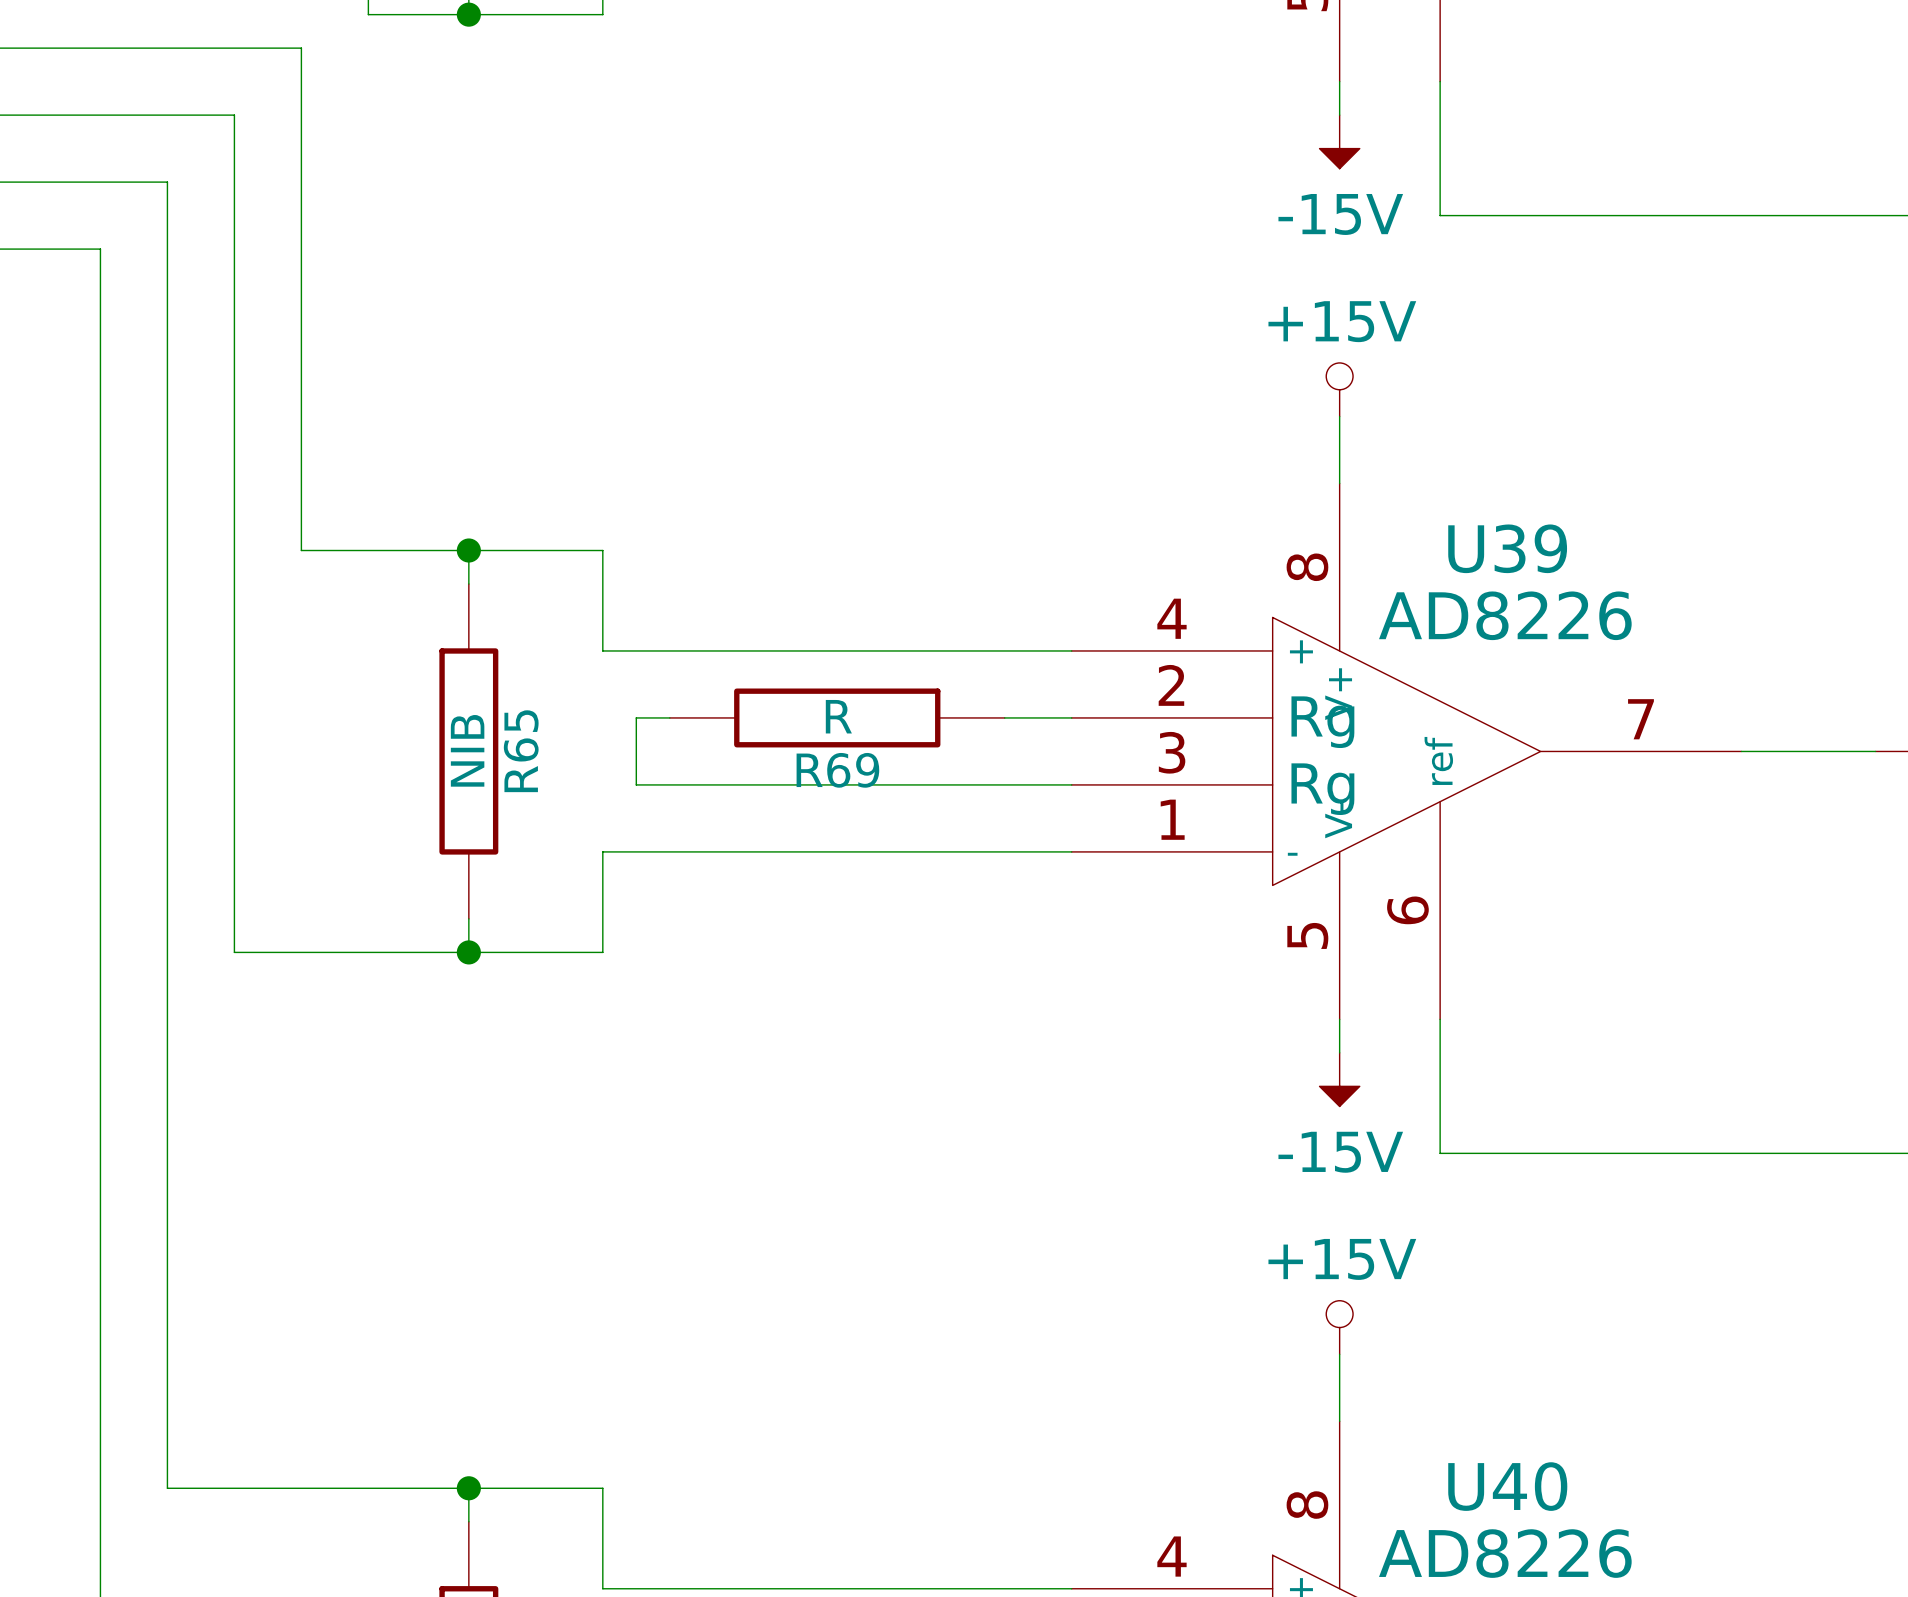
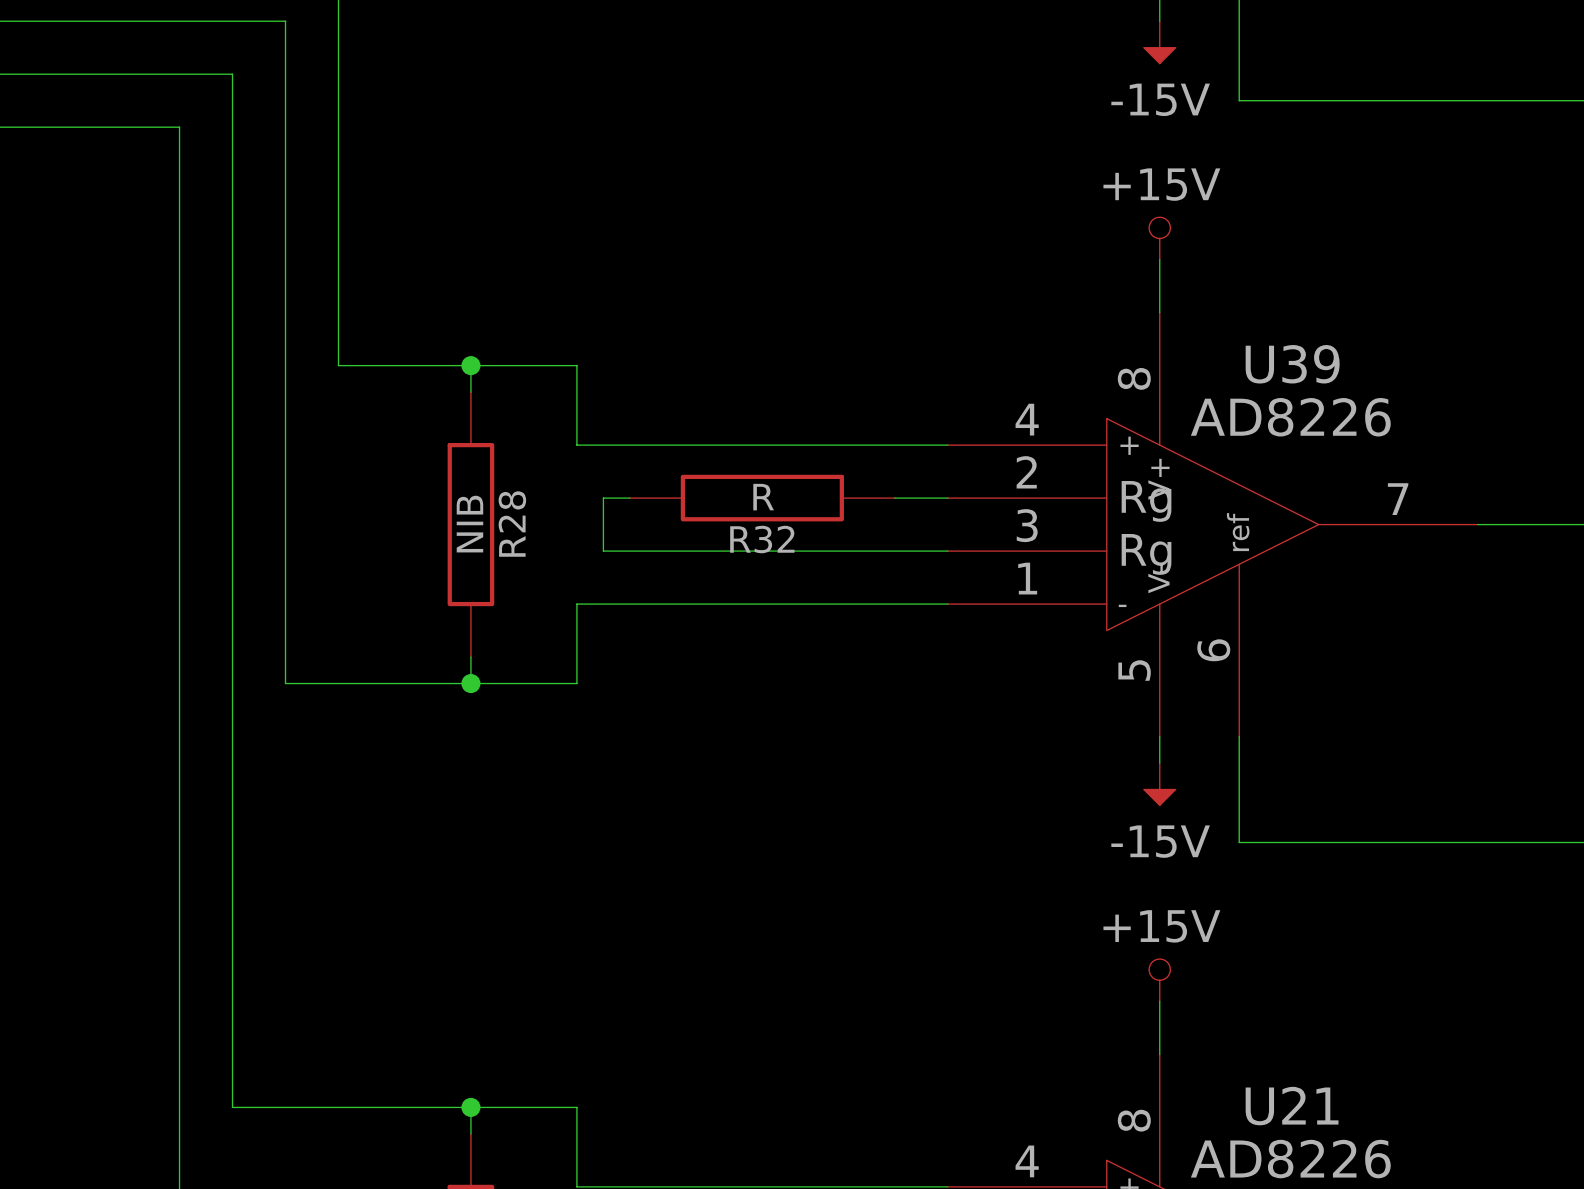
R65 name: R65 (521, 751) -> R28 (512, 524)
R69 name: R69 (837, 770) -> R32 (762, 539)
U40 name: U40 (1507, 1486) -> U21 (1292, 1106)

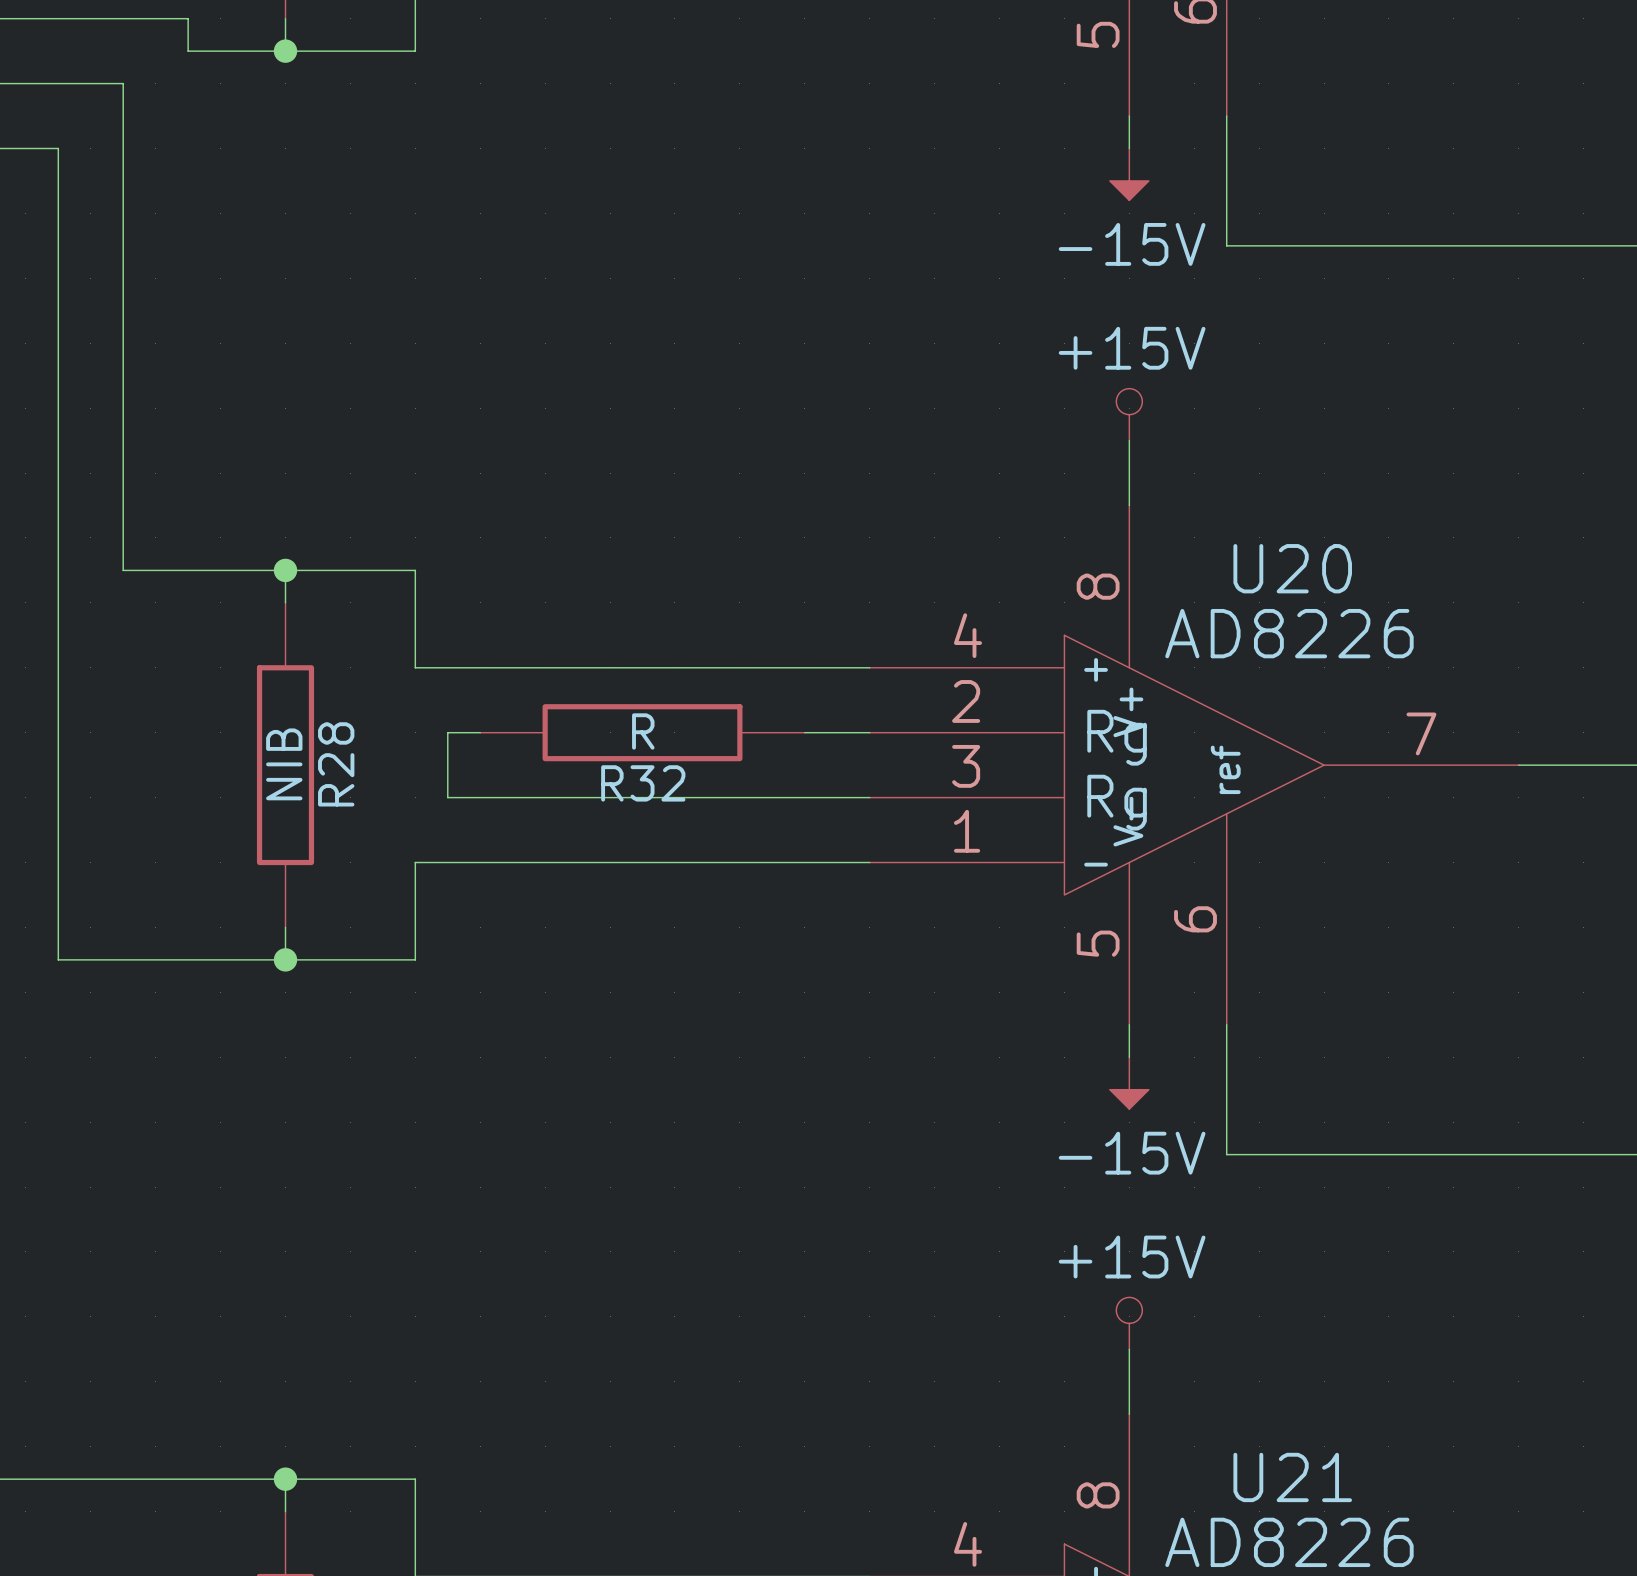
U39 name: U39 (1292, 364) -> U20 (1292, 568)

